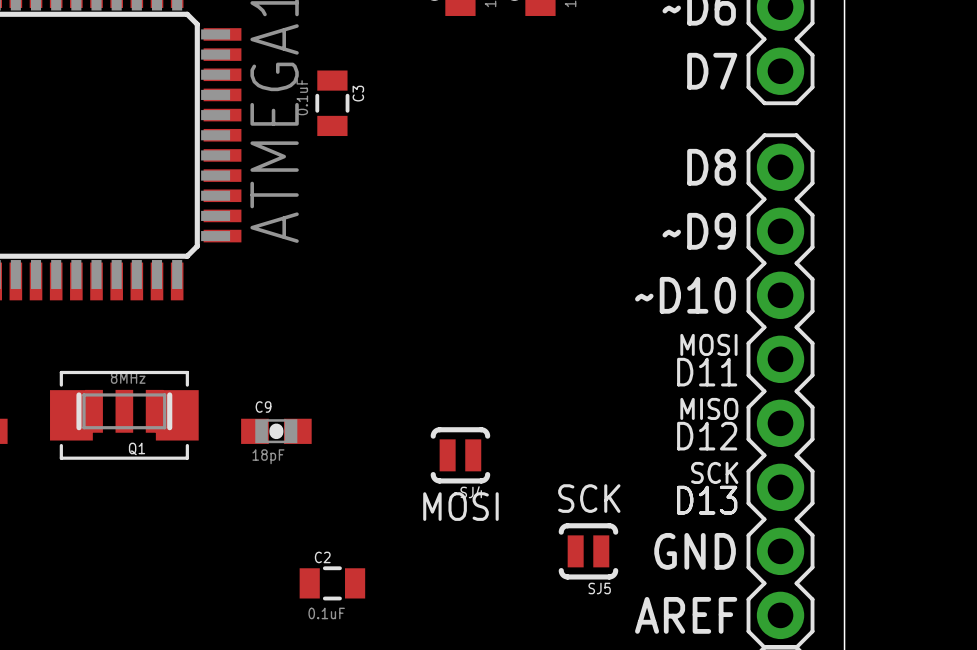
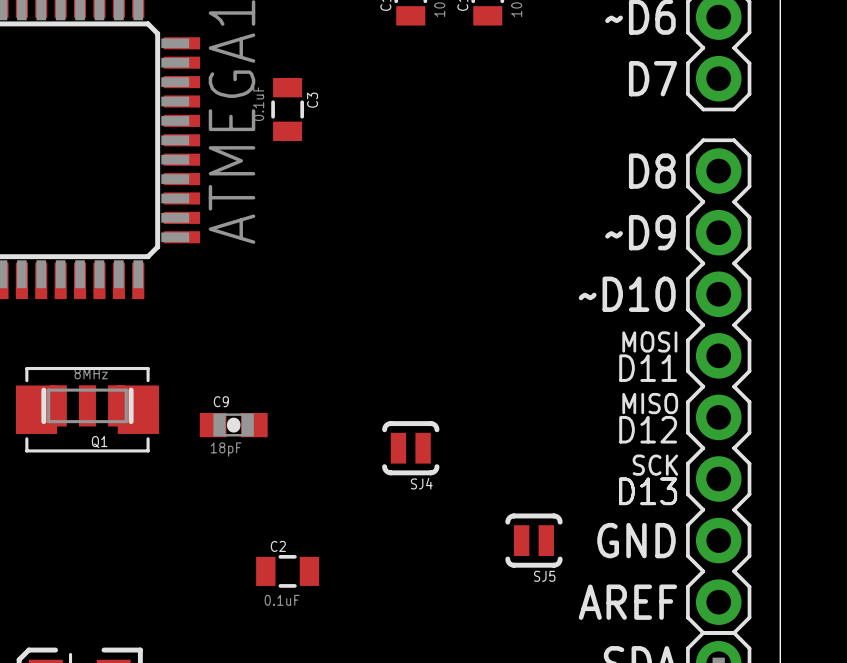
text: SCK (589, 498) -> none
text: MOSI (460, 506) -> none

